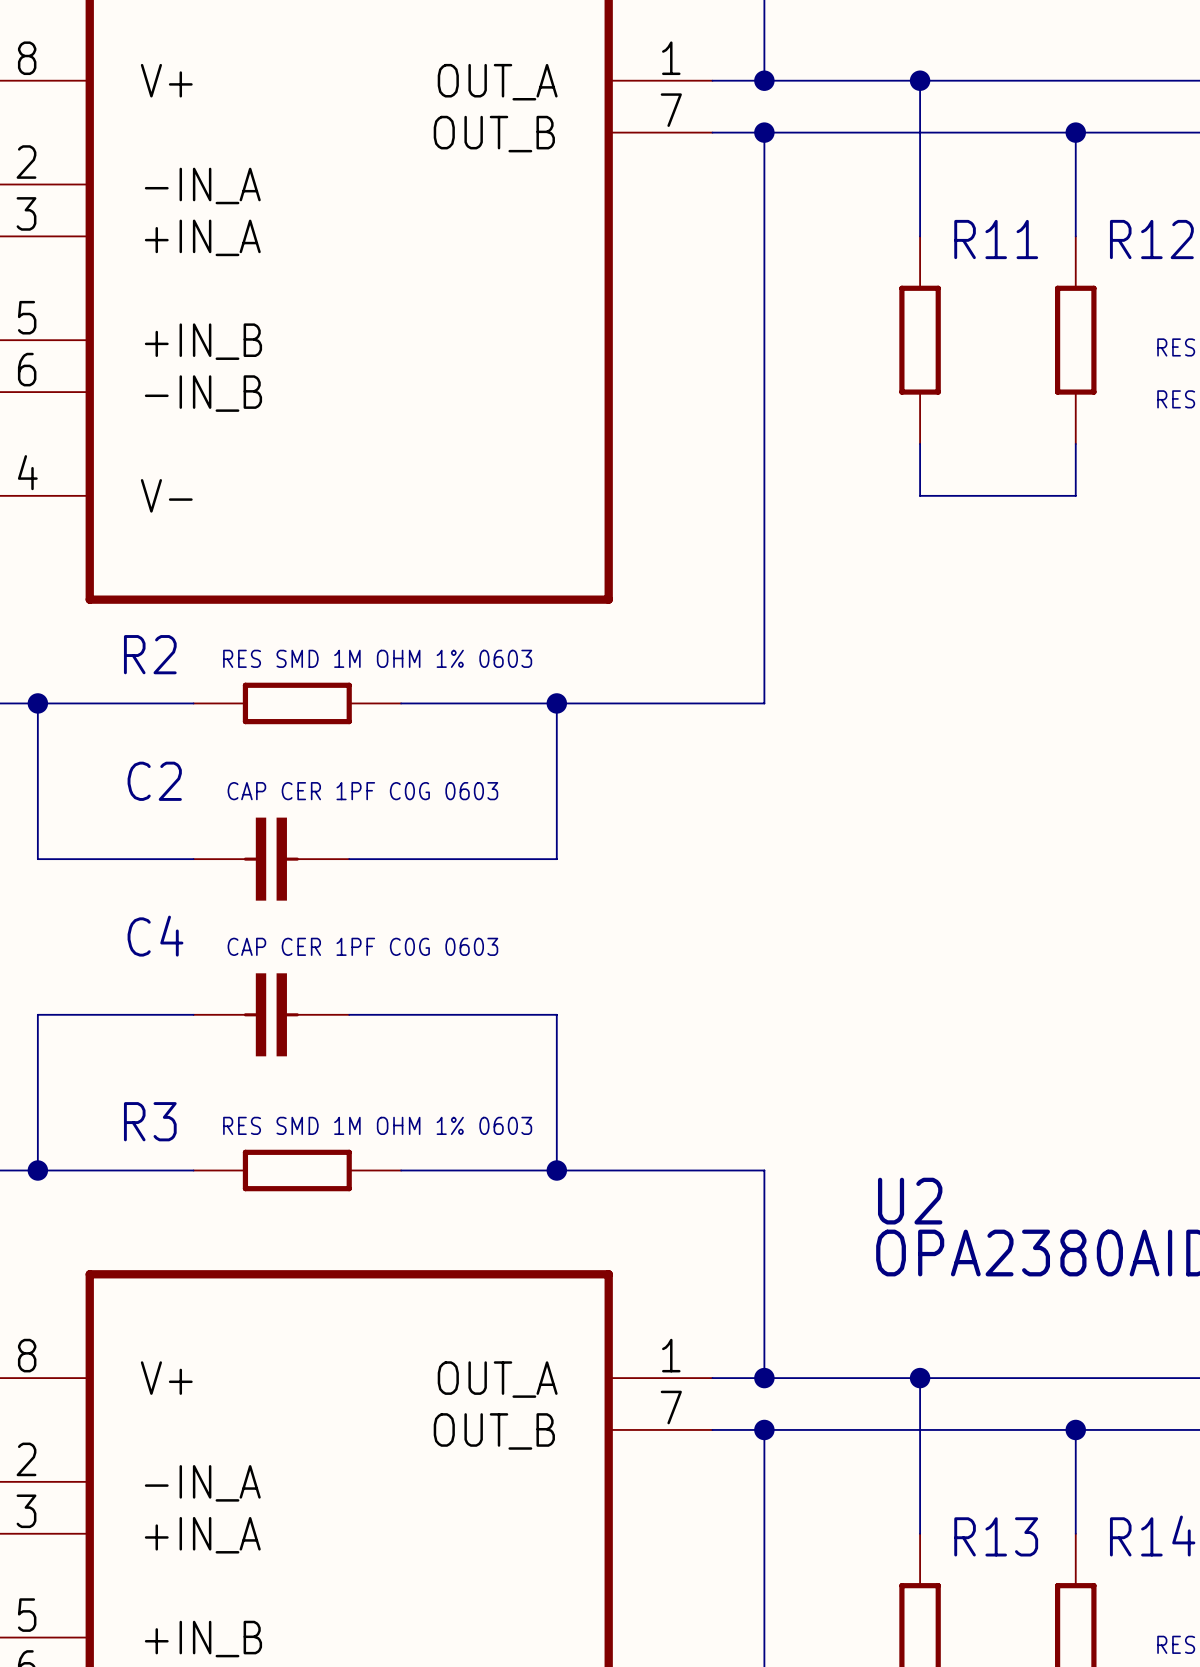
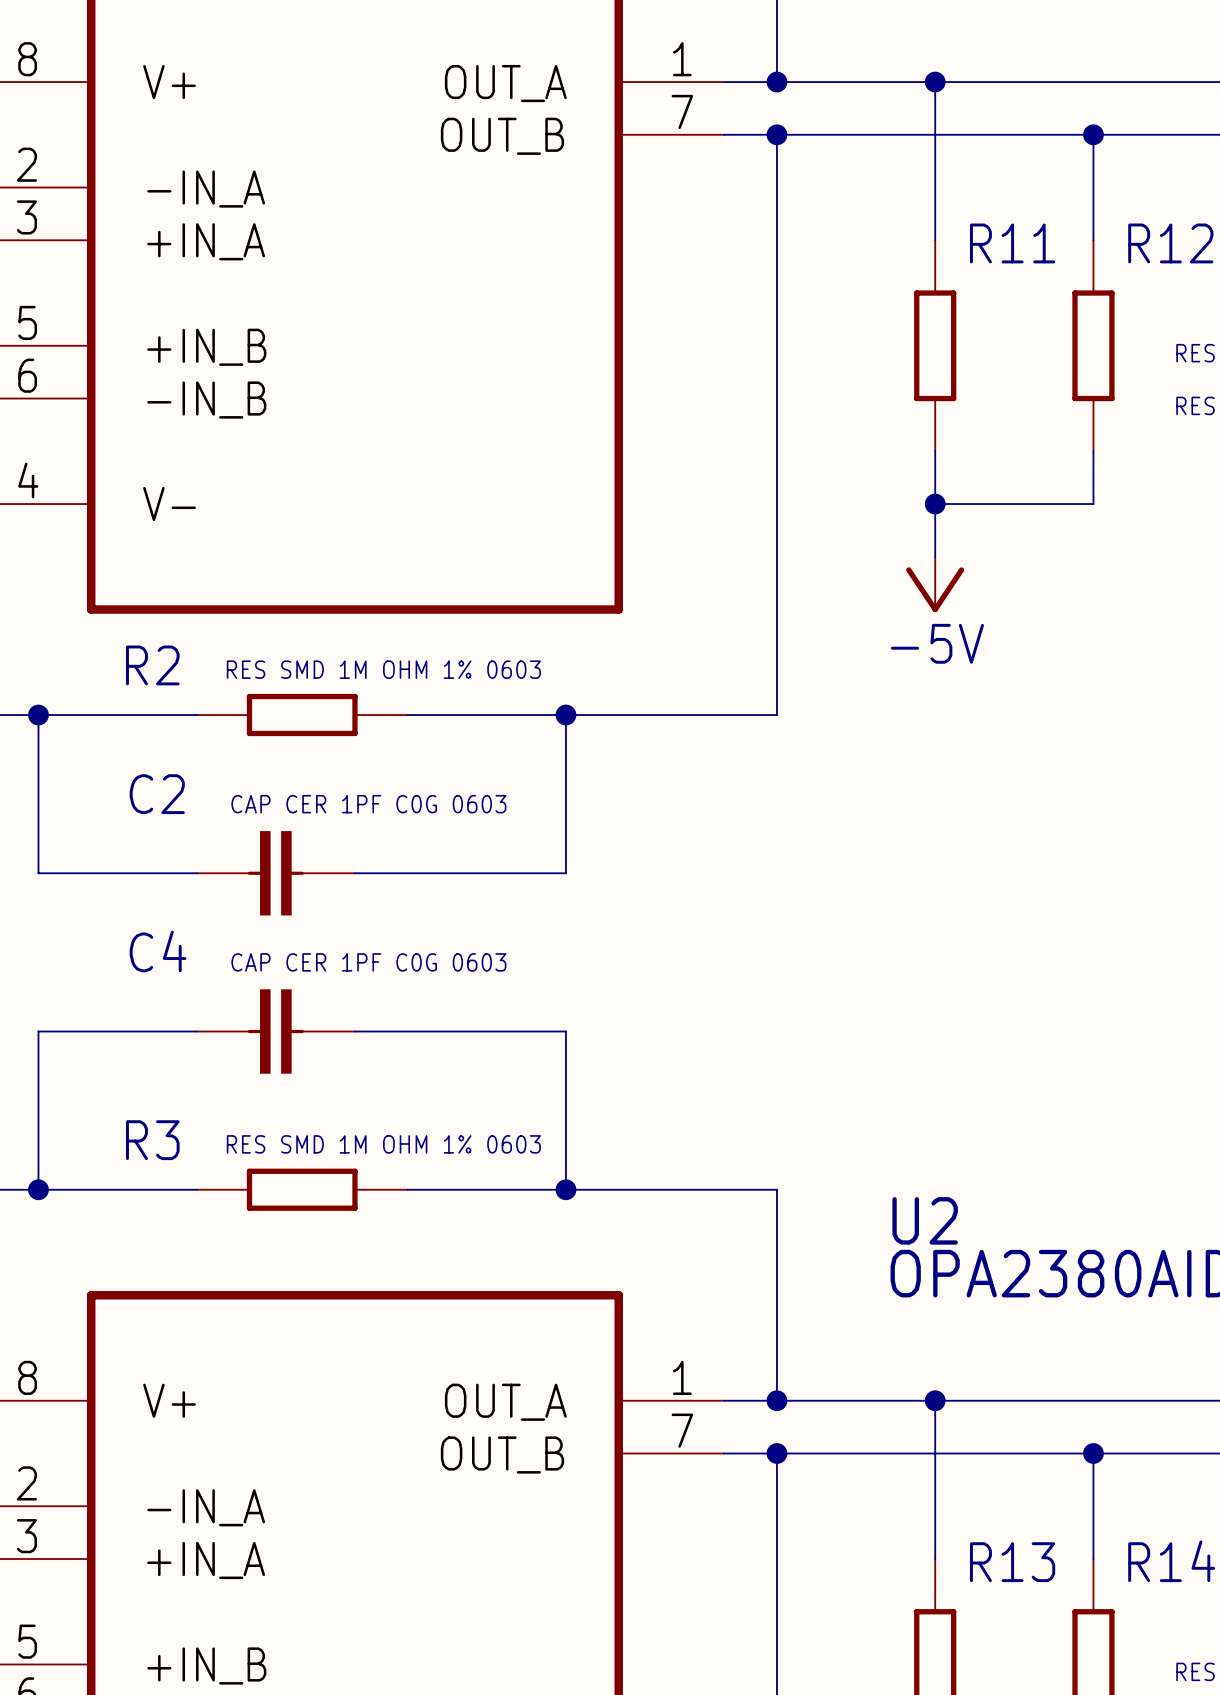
wire: none -> (935, 504) (935, 556)
junction: none -> (935, 504)
power symbol: none -> -5V (935, 584)

